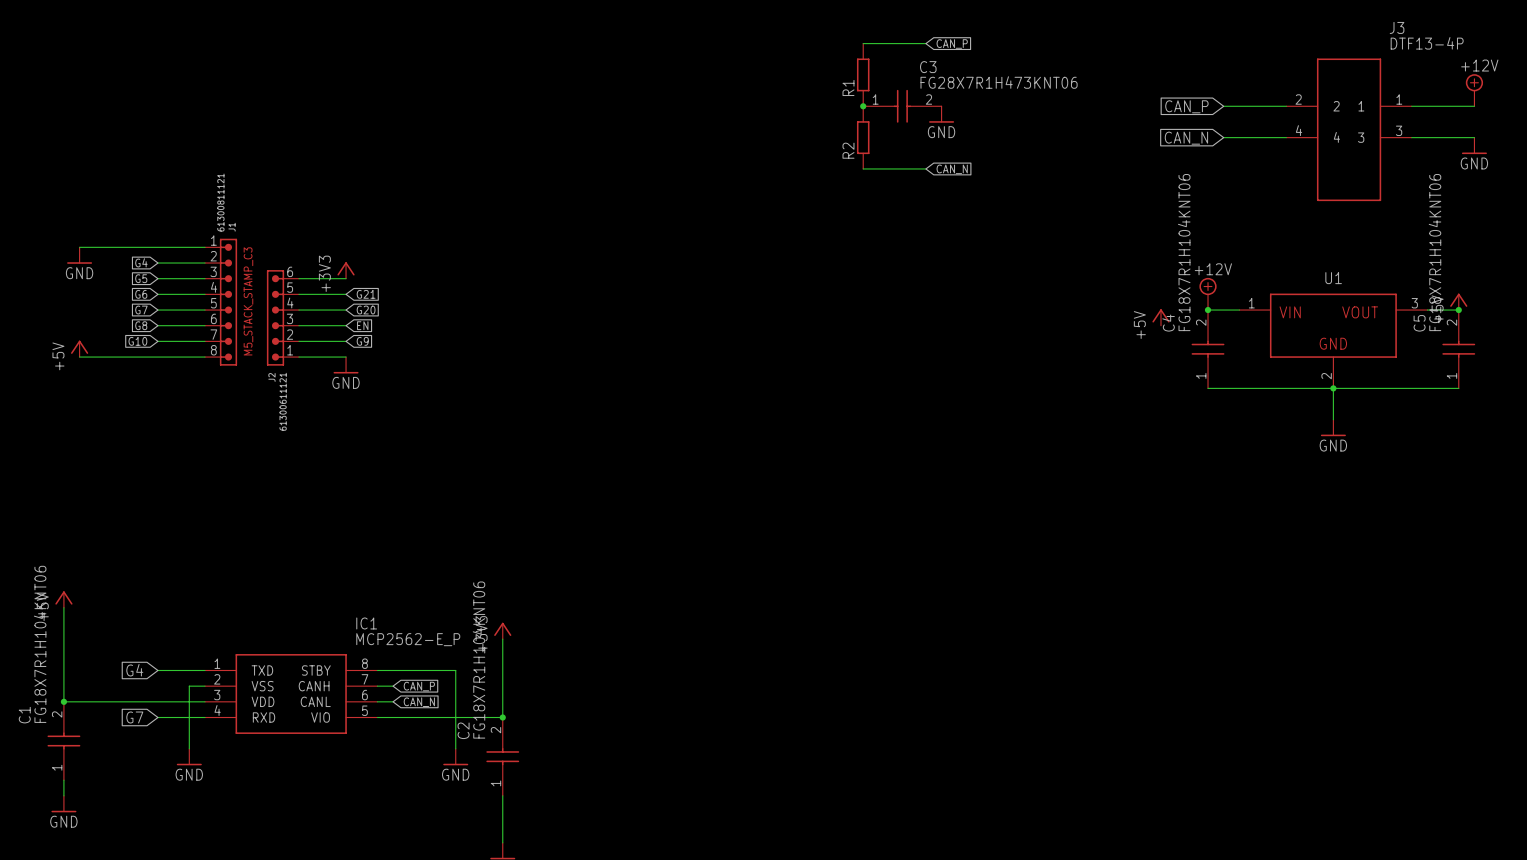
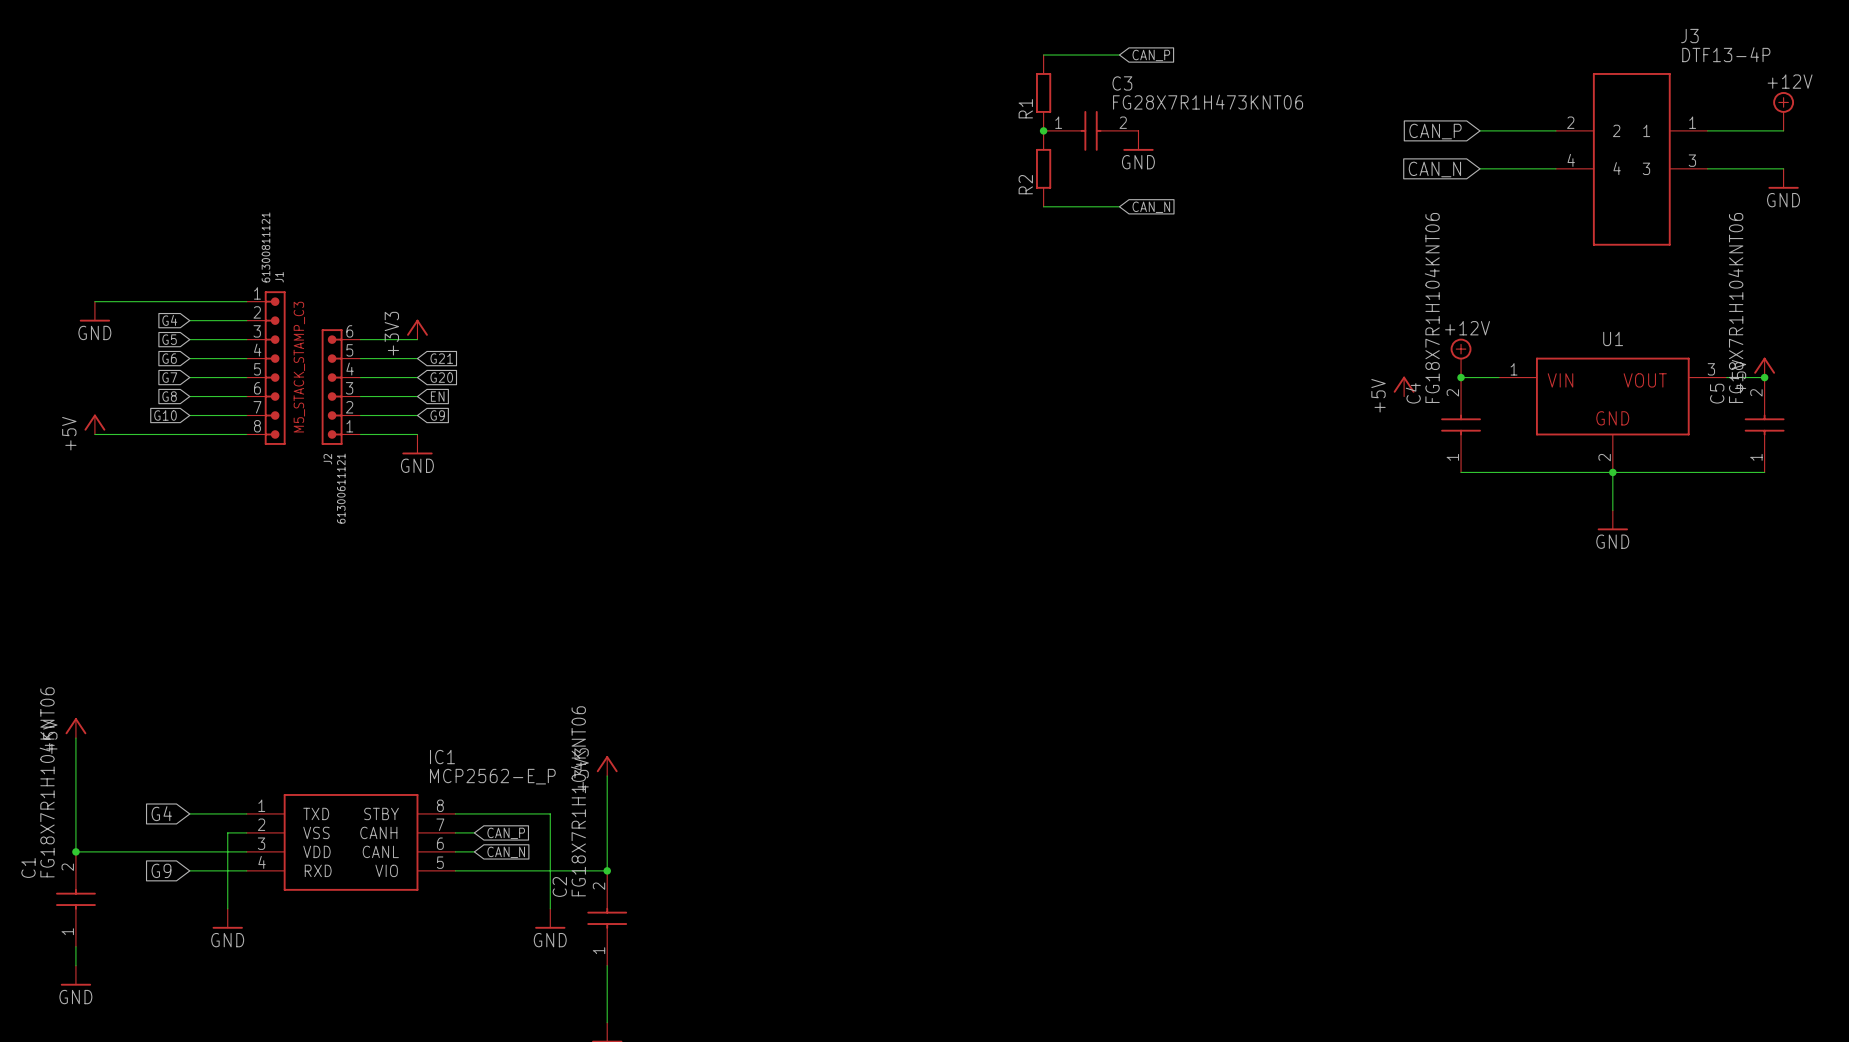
global label: G7 (134, 717) -> G9 (161, 870)

